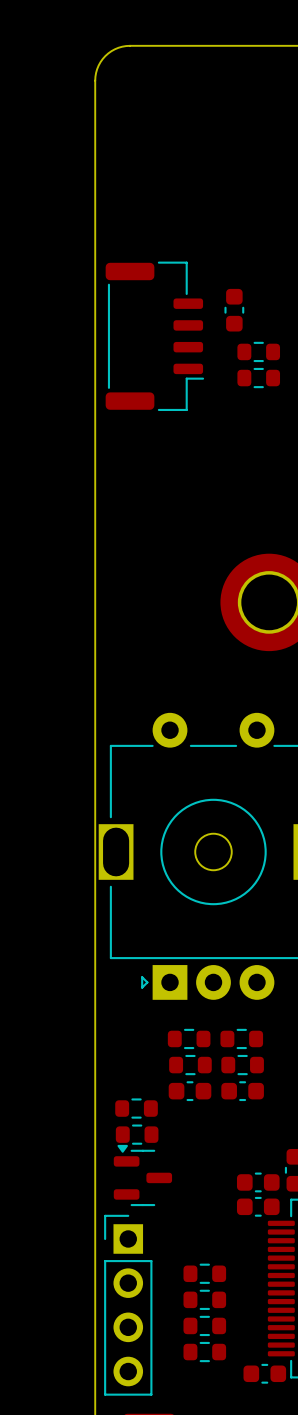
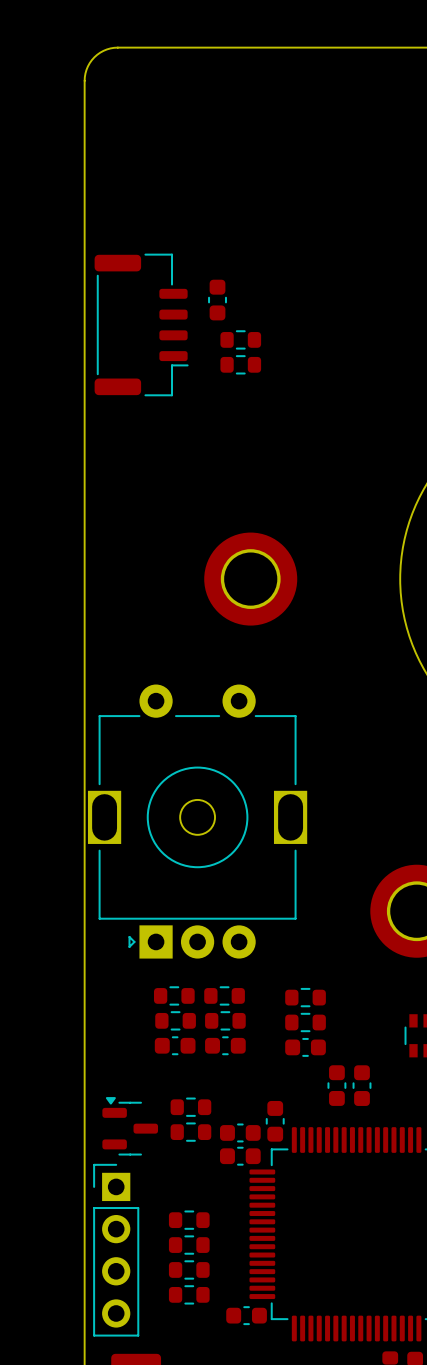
part: (136, 1108) -> none
part: (137, 1134) -> none
part: none -> (190, 1107)
part: none -> (190, 1132)

